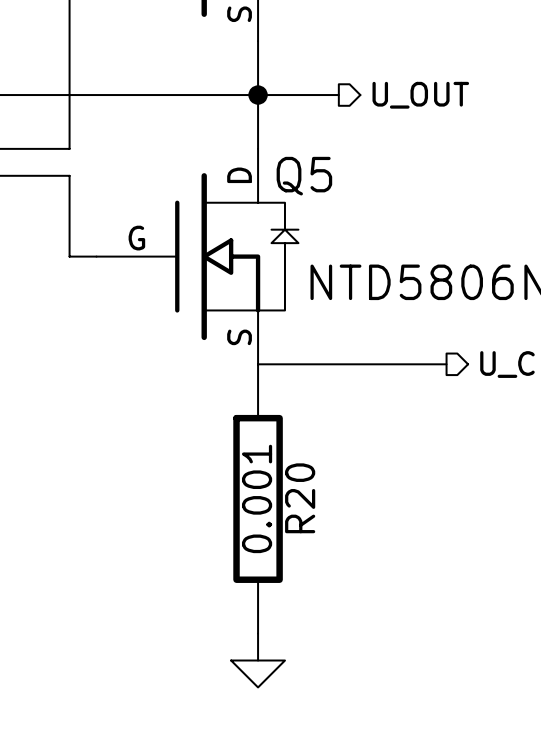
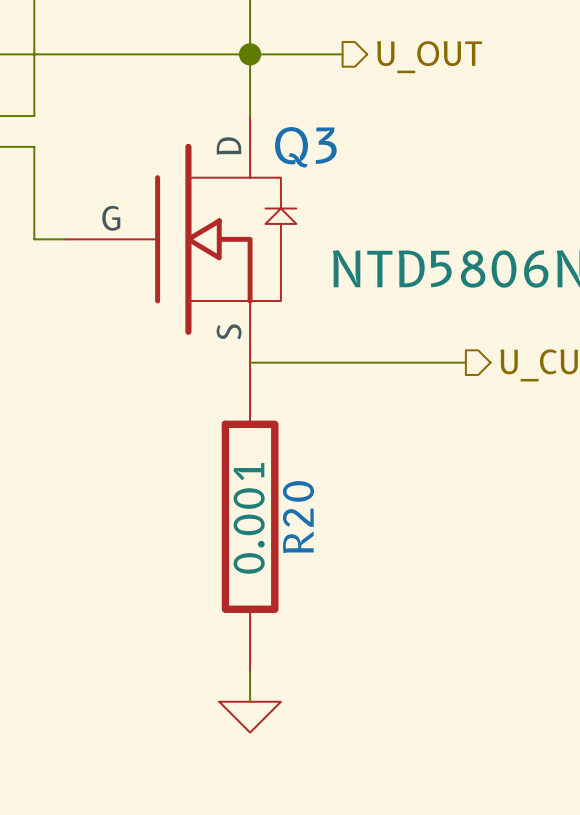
Q5 name: Q5 (304, 176) -> Q3 (305, 147)

